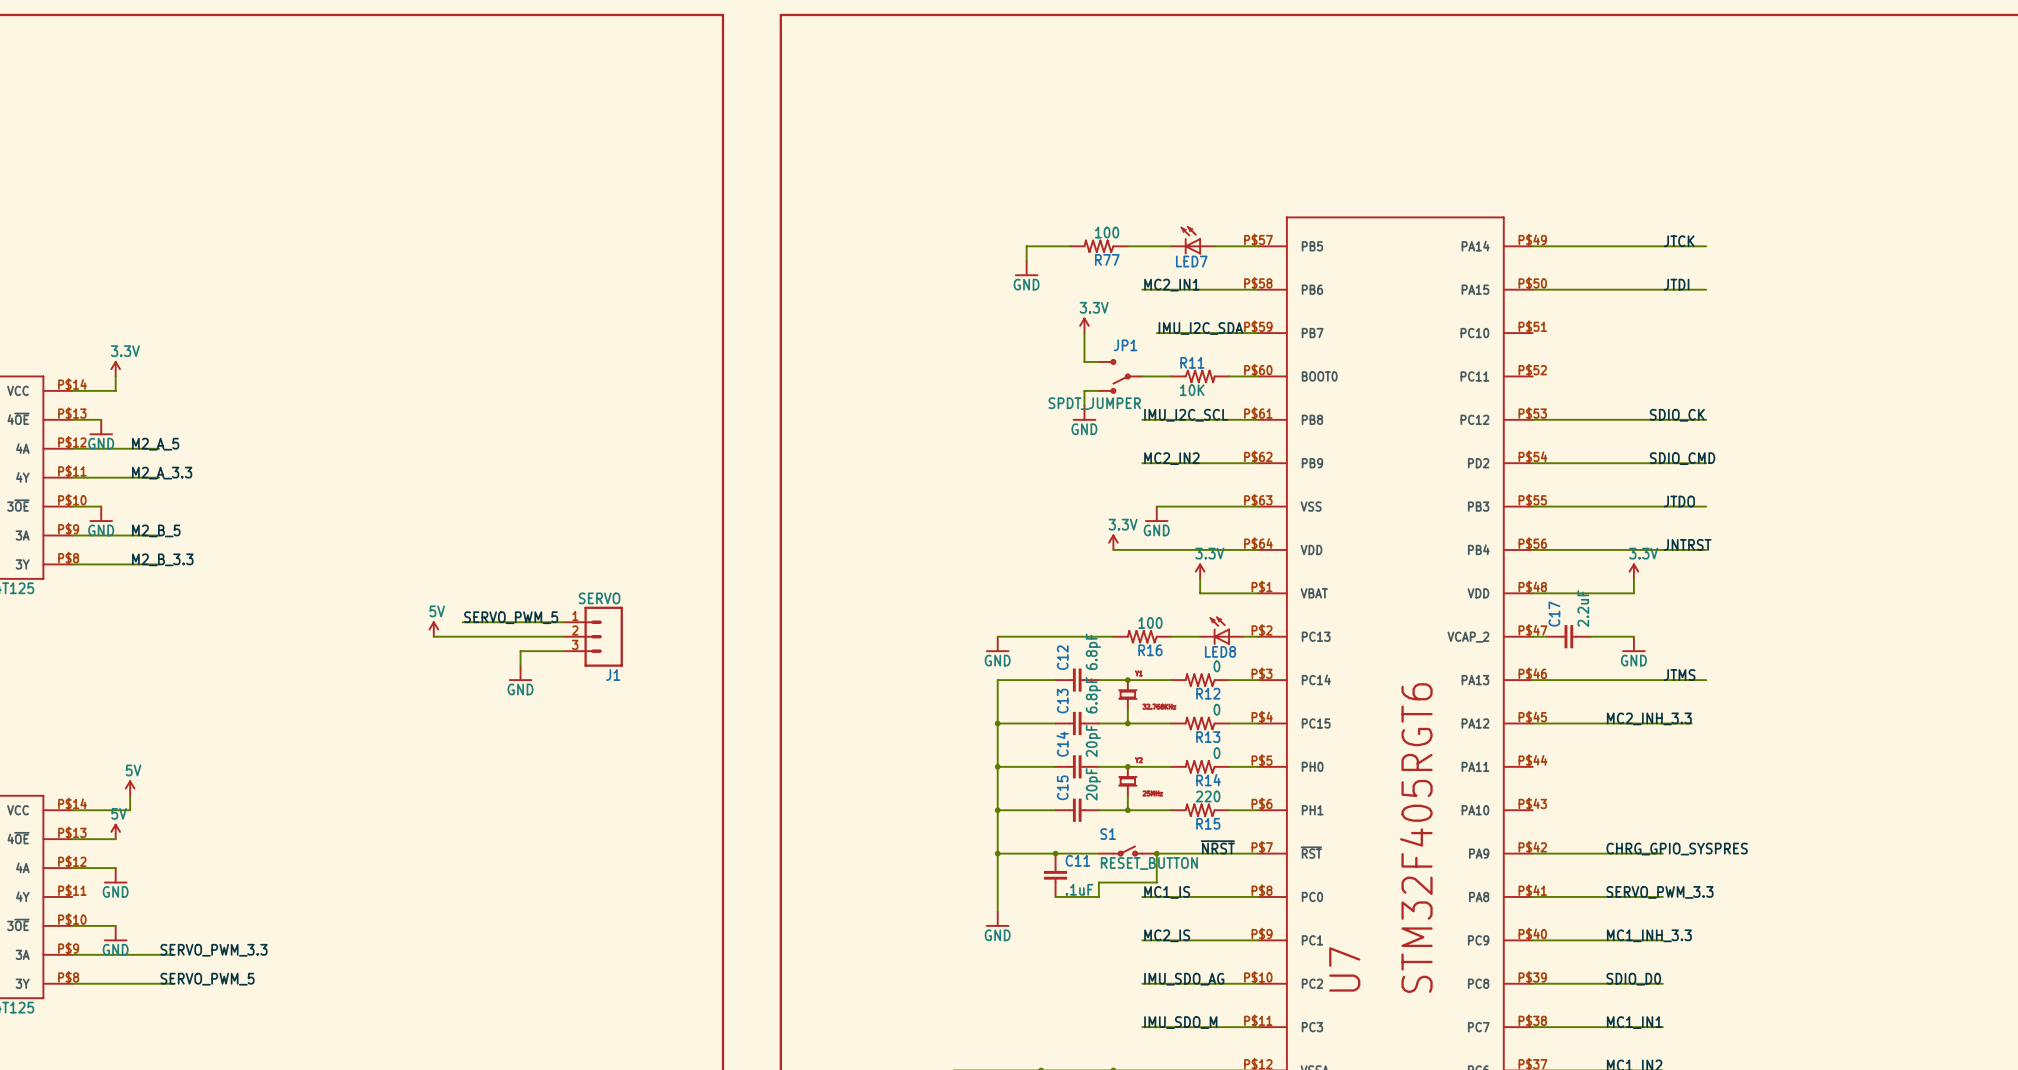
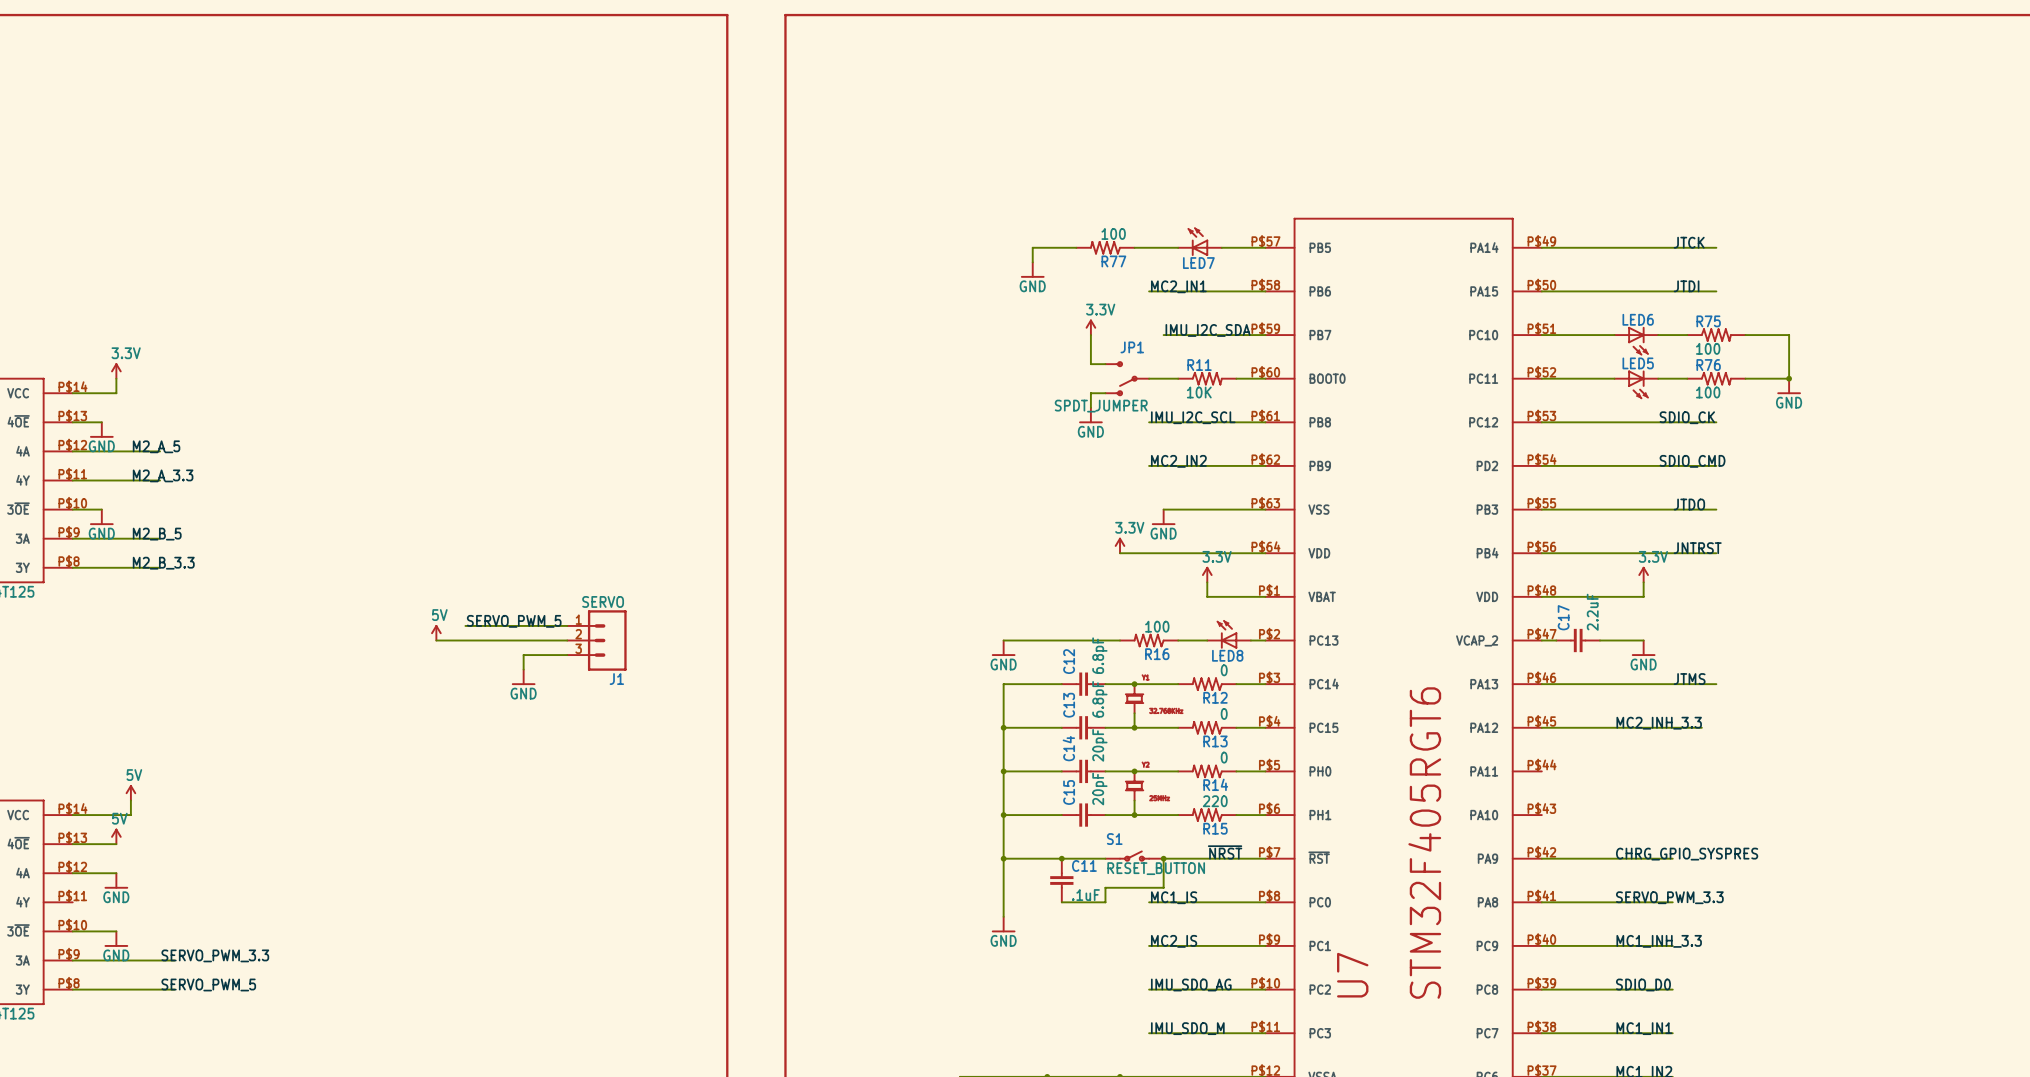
wire: none -> (1541, 335) (1614, 335)
wire: none -> (1658, 335) (1687, 335)
R75: none -> 100 (1716, 335)
wire: none -> (1745, 335) (1789, 335) (1789, 378) (1745, 378)
LED6: none -> (1636, 341)
wire: none -> (1541, 378) (1614, 378)
wire: none -> (1658, 378) (1687, 378)
R76: none -> 100 (1716, 378)
junction: none -> (1789, 378)
LED5: none -> (1636, 384)
power symbol: none -> GND (1789, 386)

